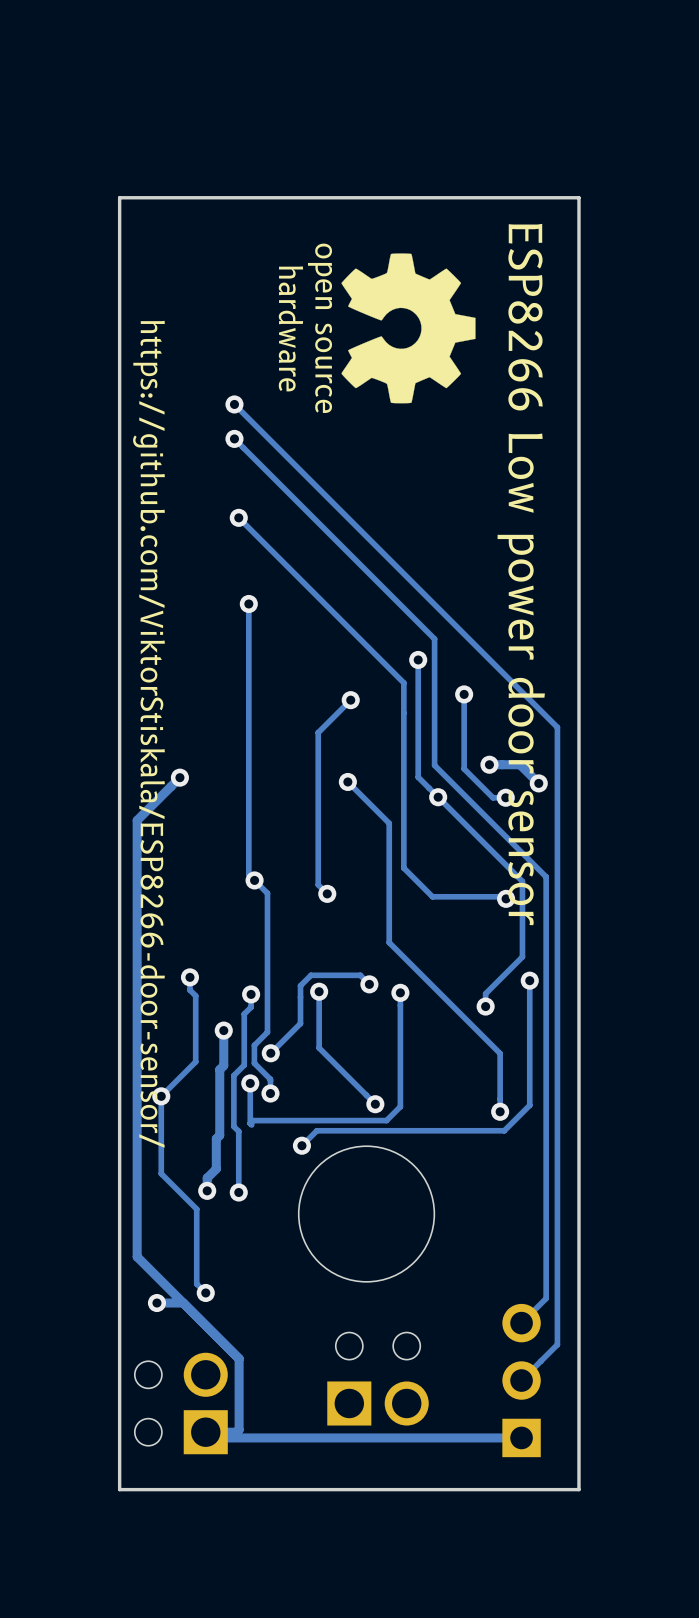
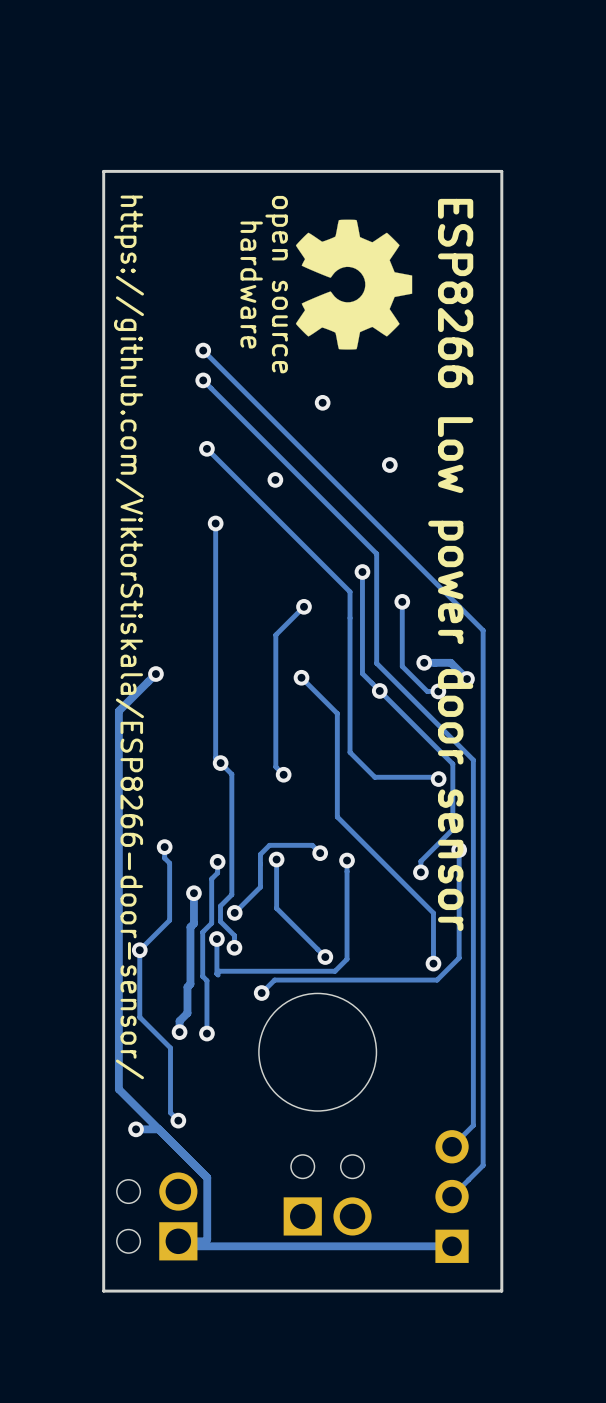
via: none -> (322, 402)
via: none -> (389, 465)
via: none -> (275, 479)

